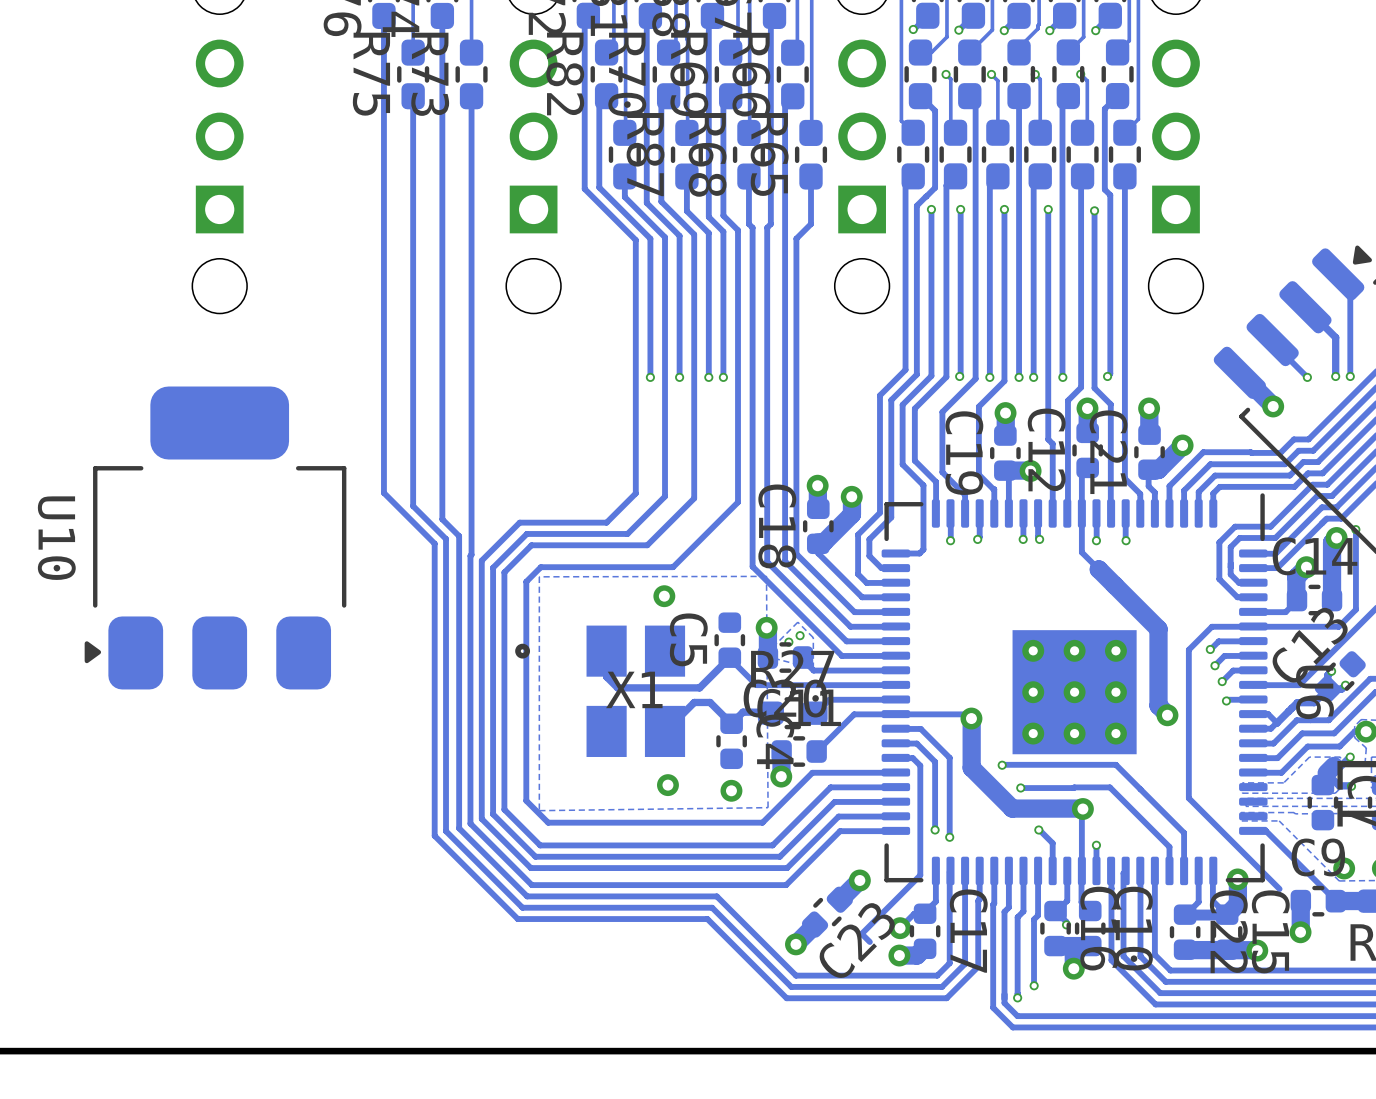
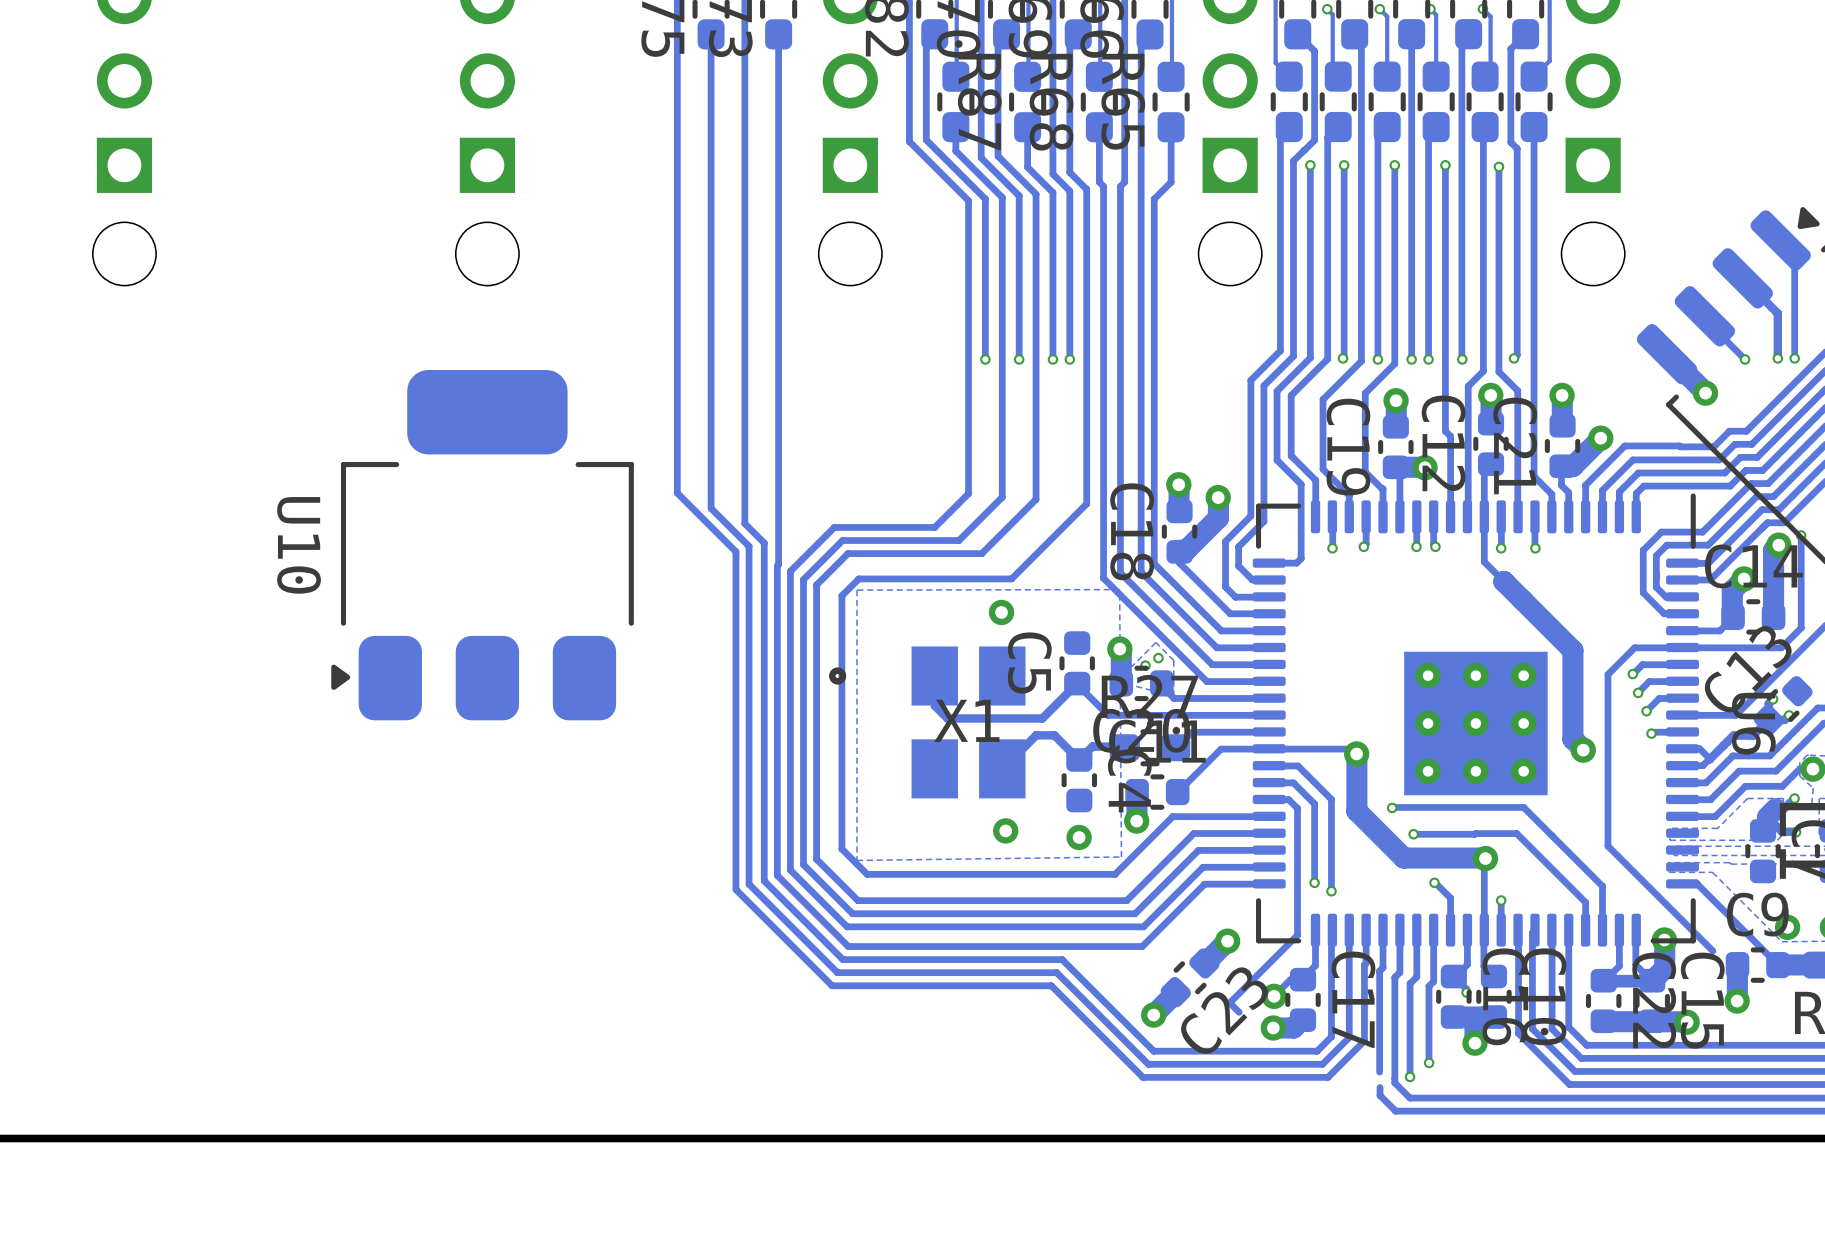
track: (993, 904) (993, 1007) (1012, 1027) -> (1381, 969) (1379, 971) (1379, 1072)
track: none -> (1380, 1087) (1380, 1095) (1395, 1111) (1404, 1111)

